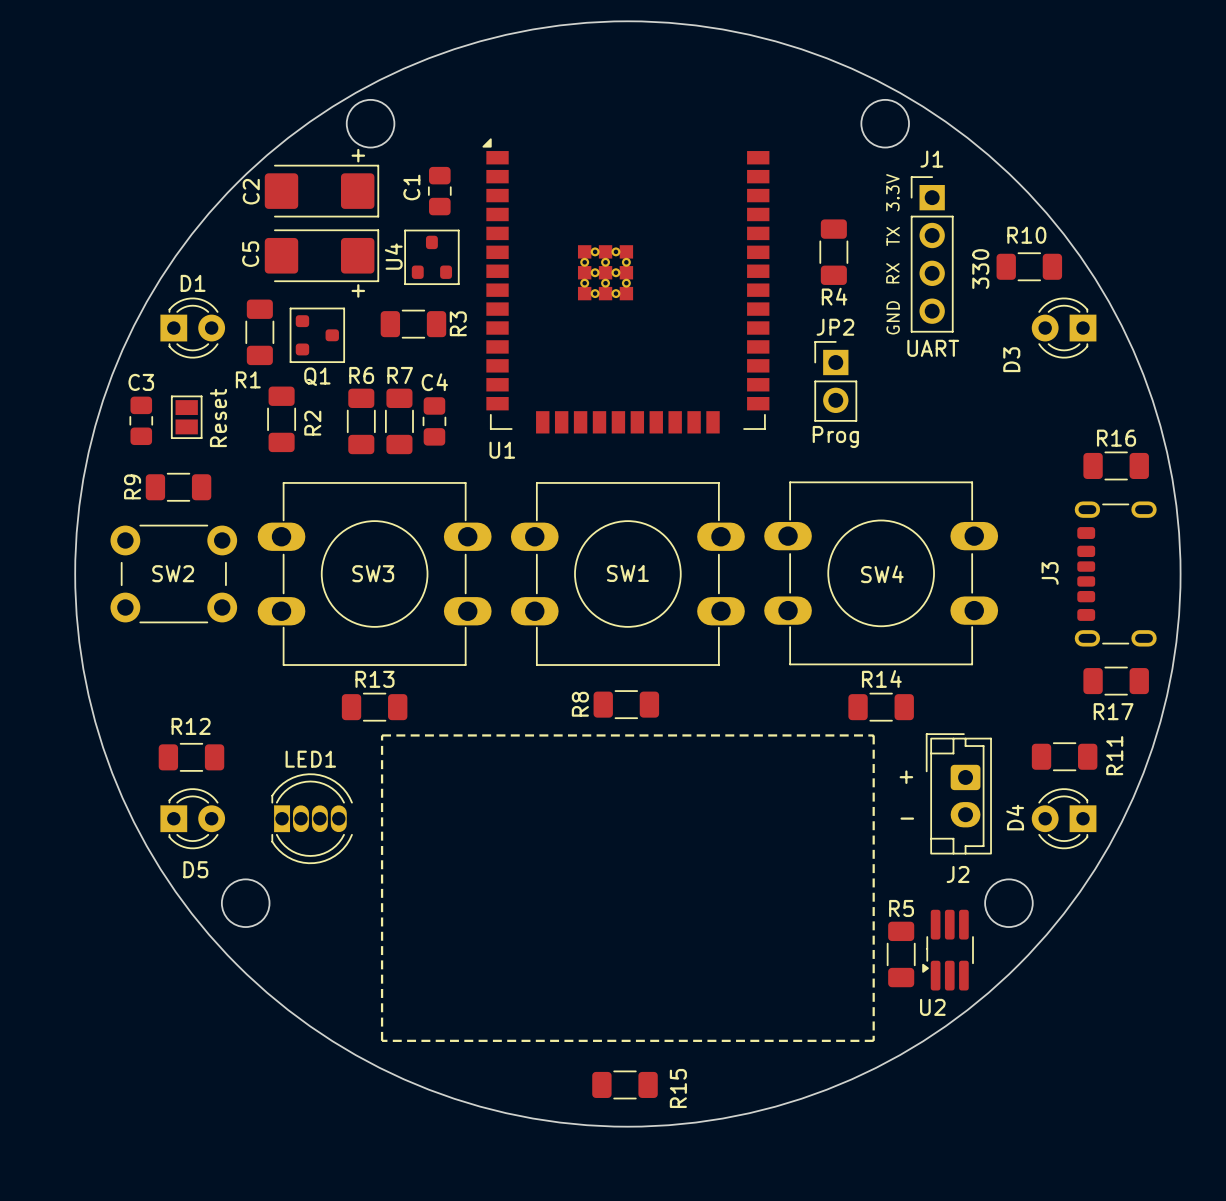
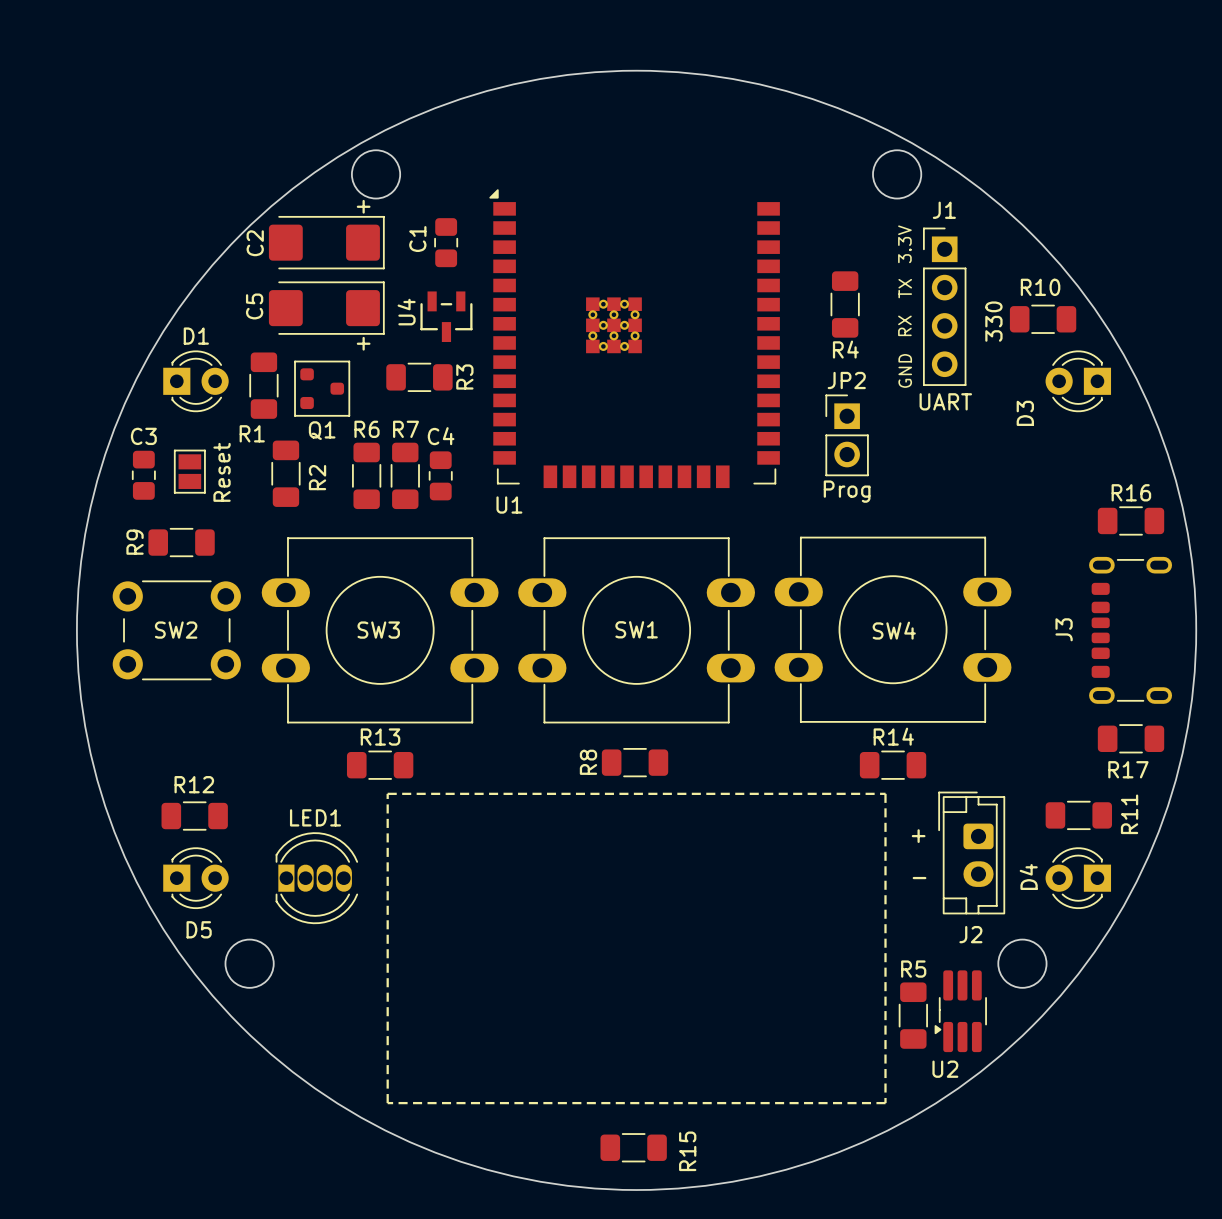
U4 footprint: [404, 229, 460, 286] -> [420, 291, 473, 342]

